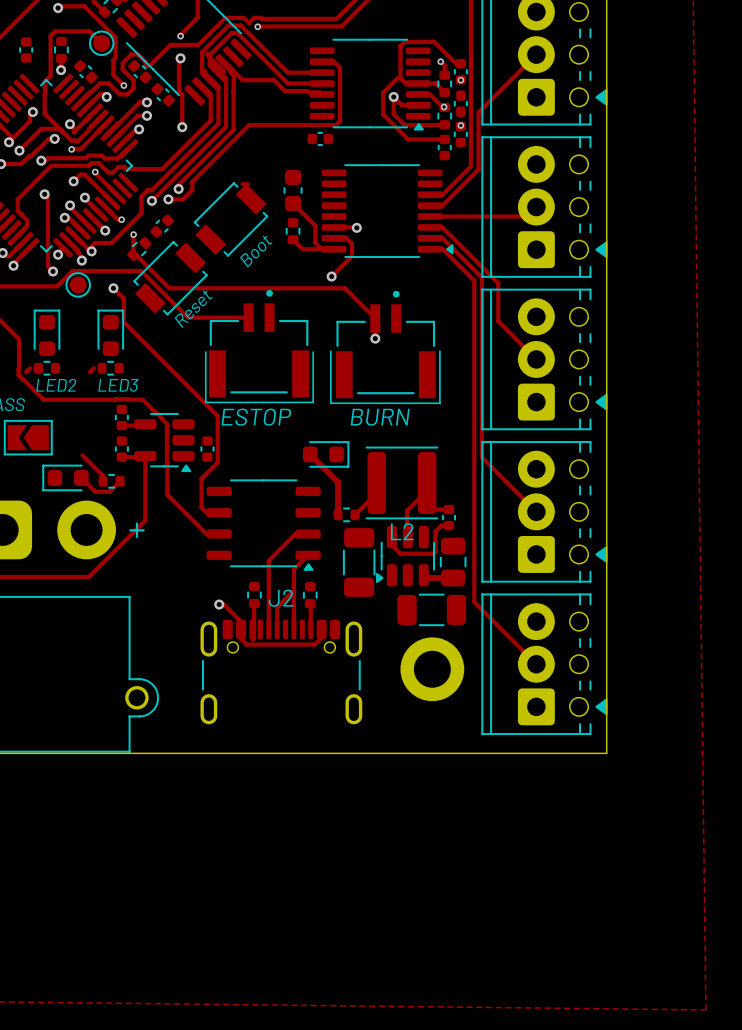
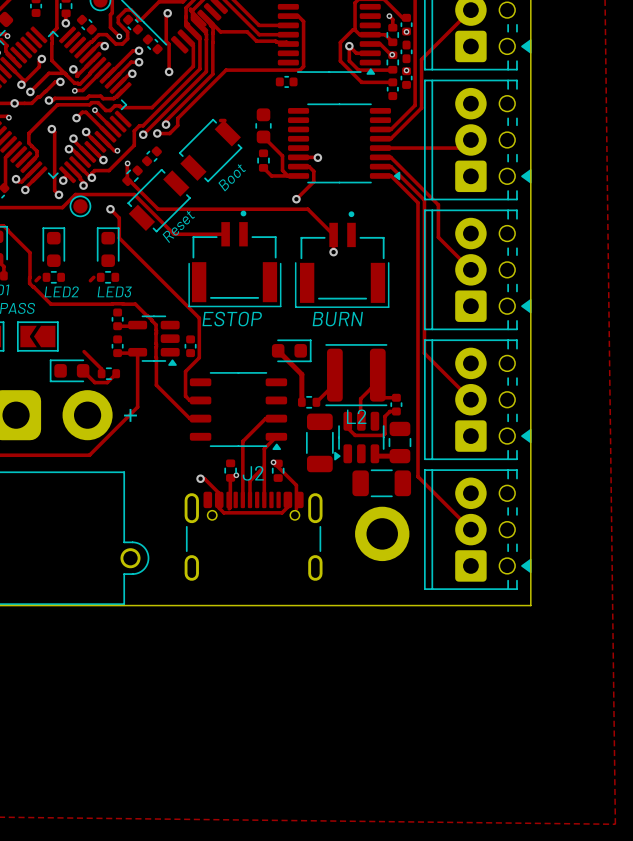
track: none -> (273, 462) (296, 485) (296, 508)
via: none -> (273, 462)
via: none -> (236, 475)
track: (310, 603) (310, 629) -> none

